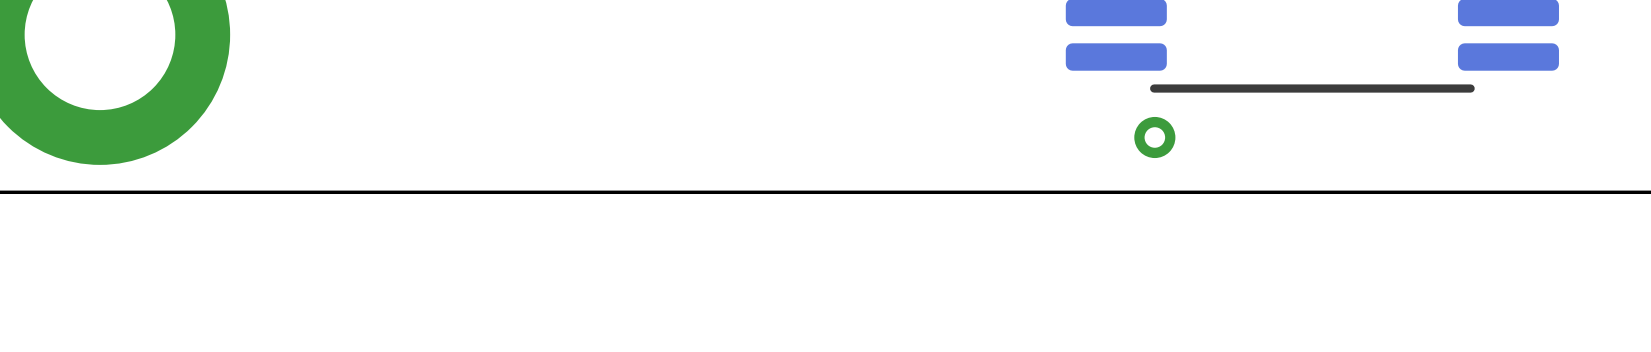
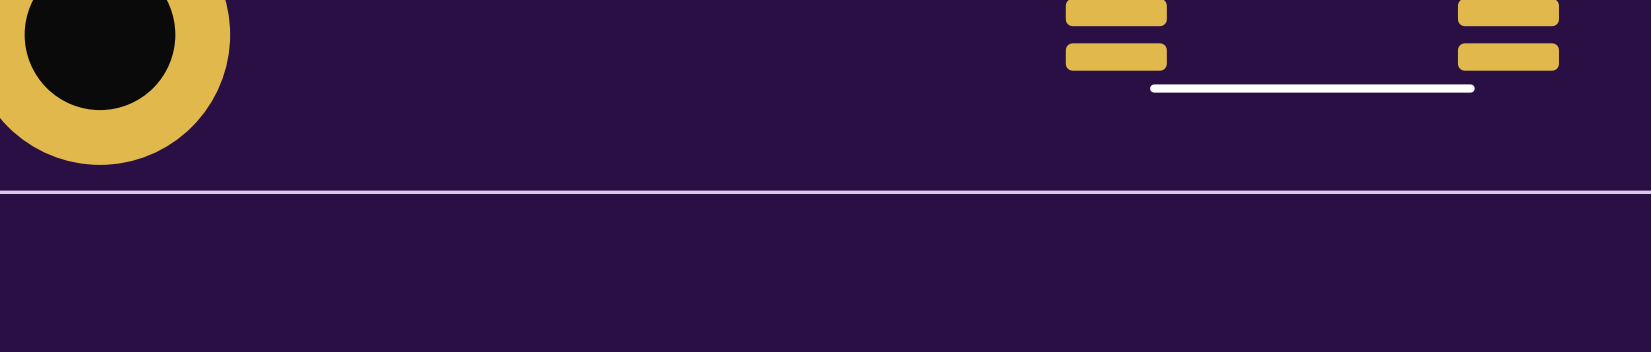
via: (1154, 137) -> none

